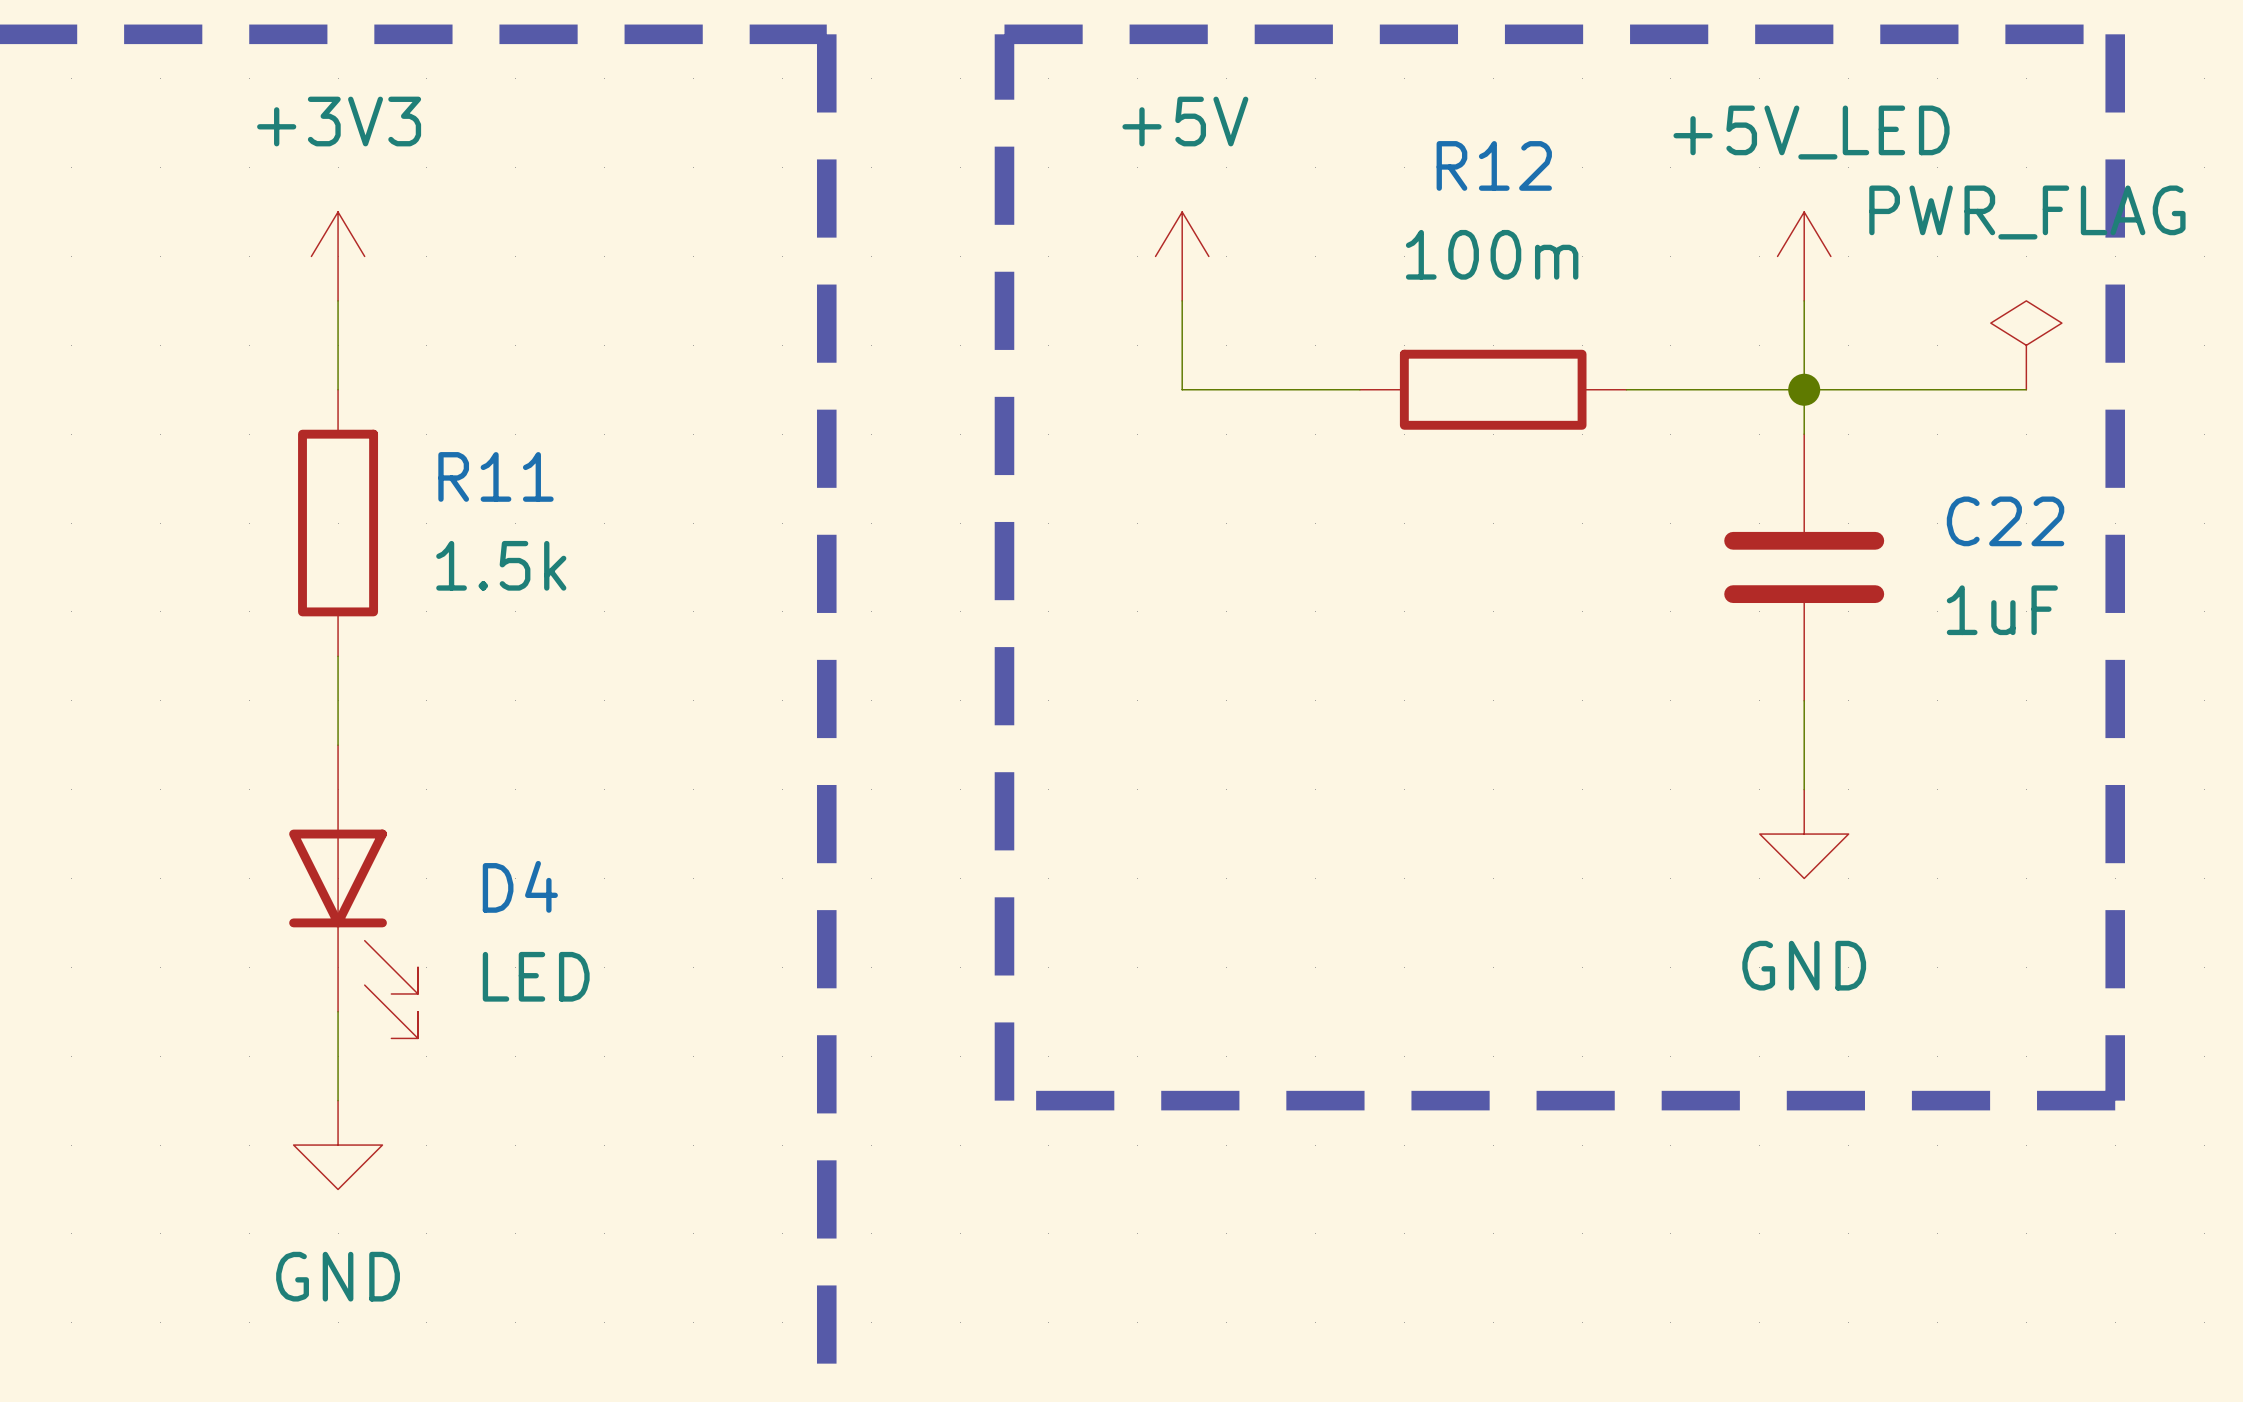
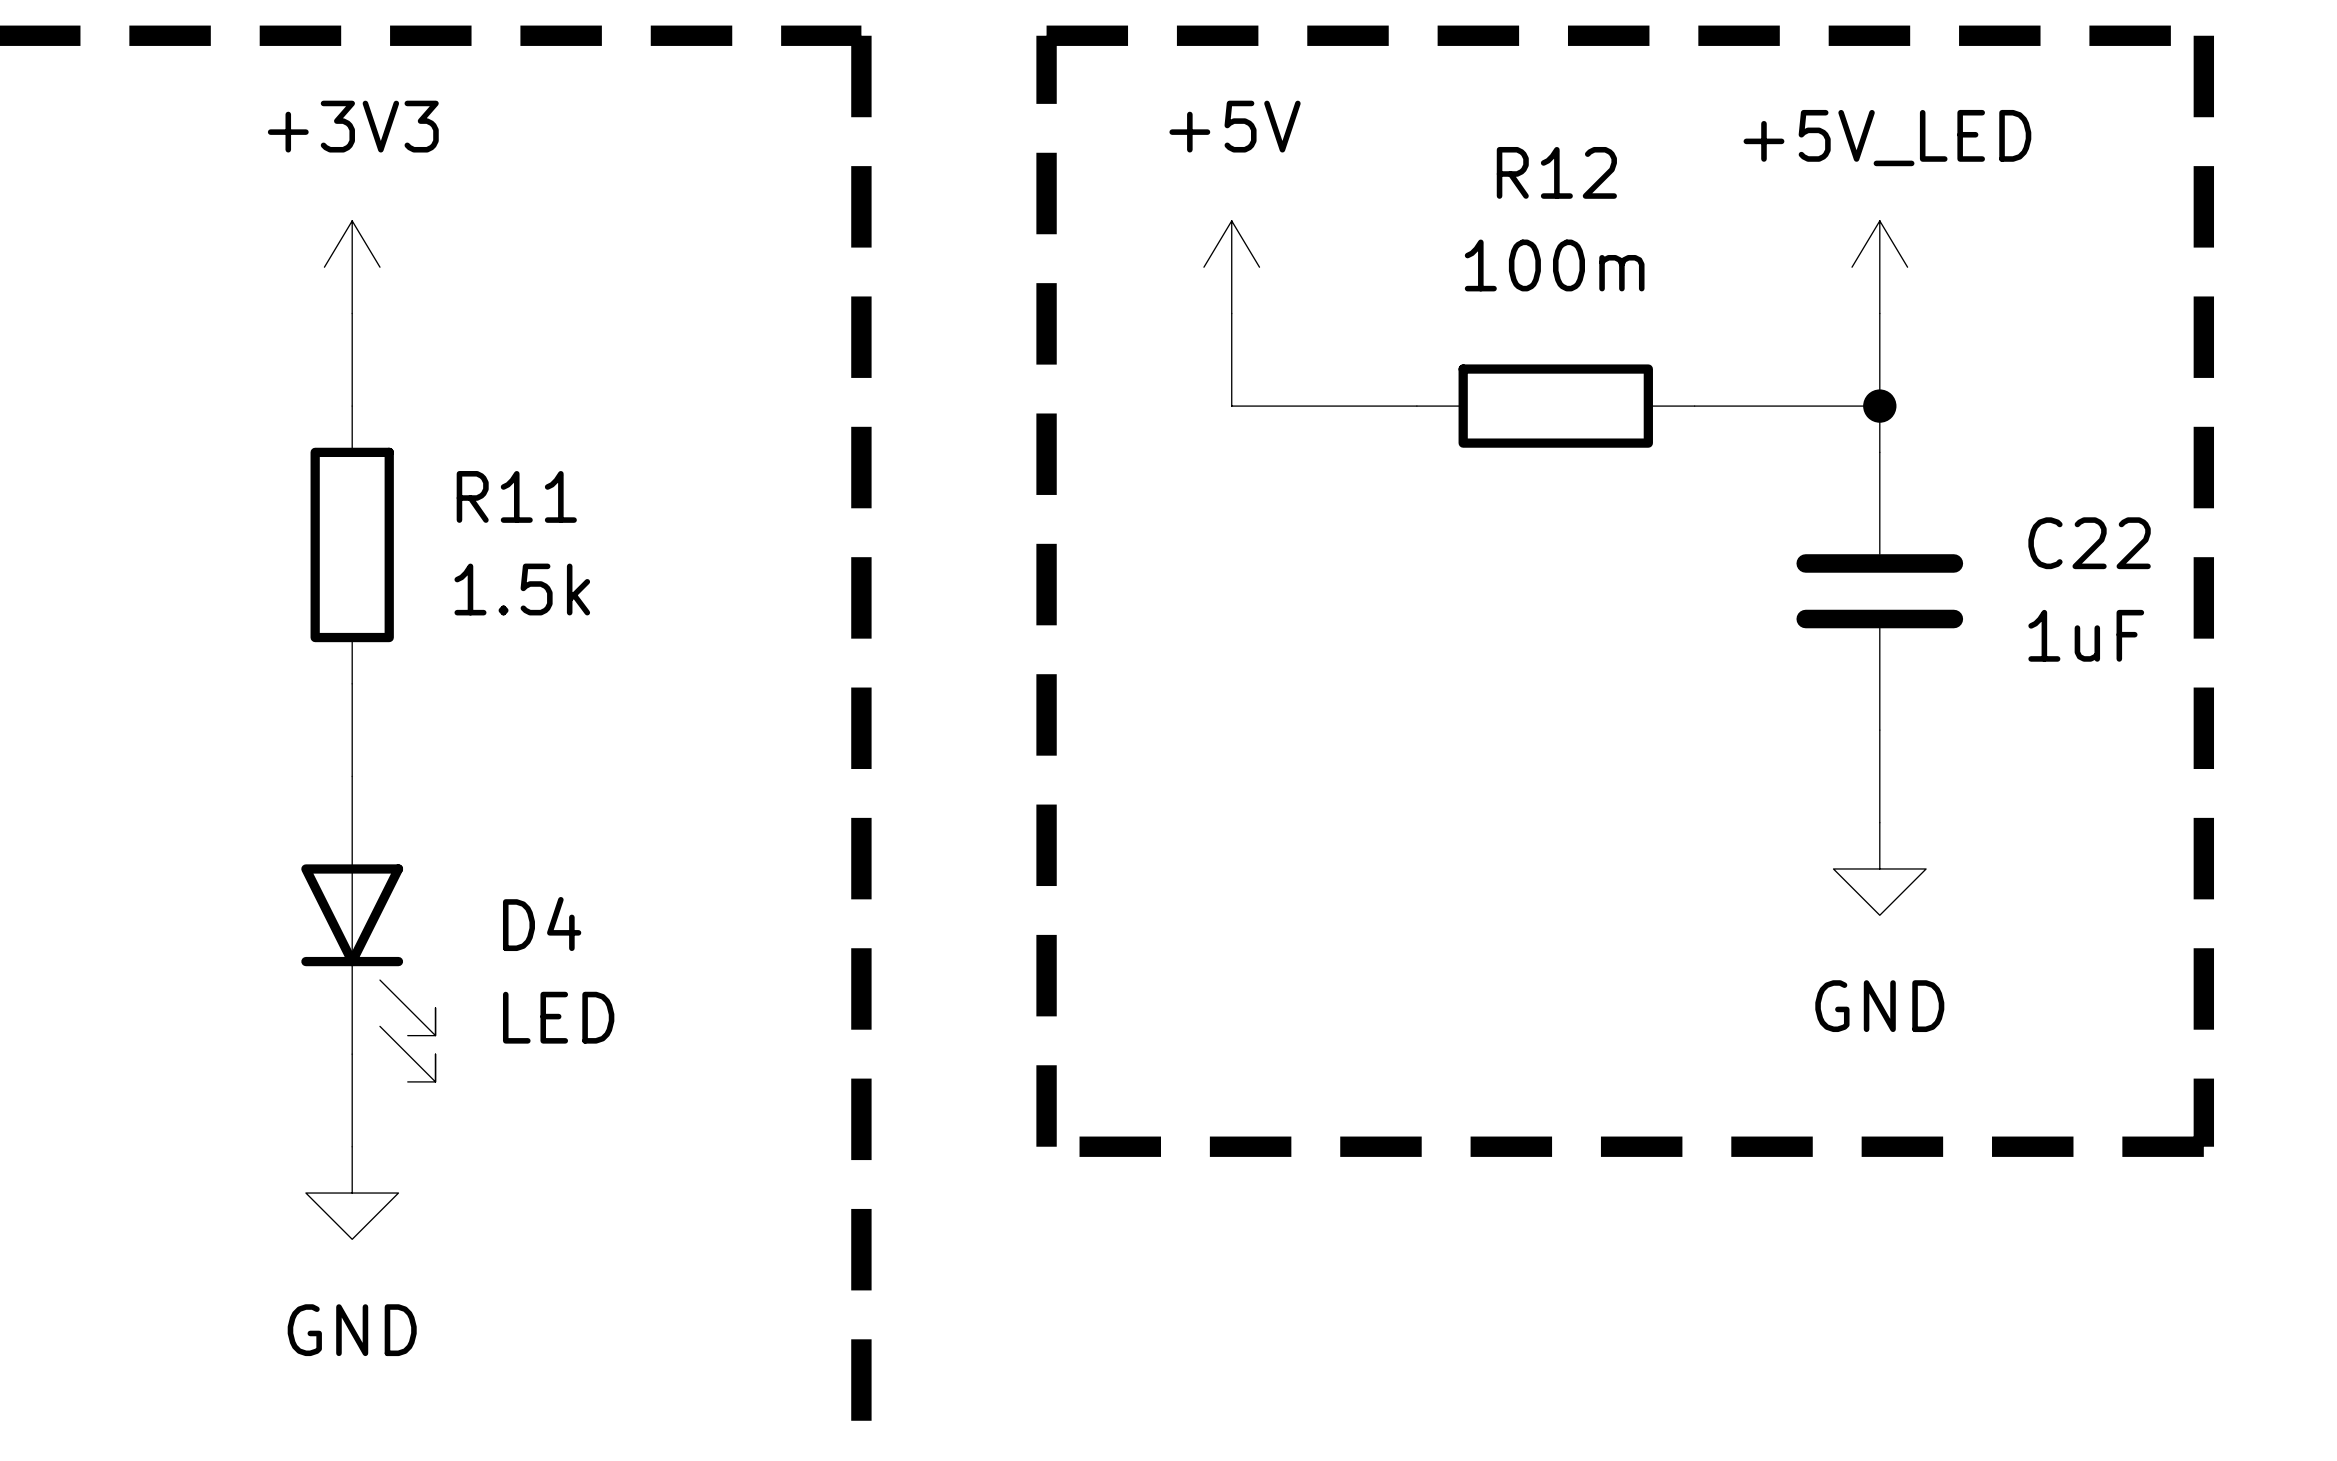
power symbol: PWR_FLAG (2026, 345) -> none
wire: (1804, 389) (2026, 389) -> none

